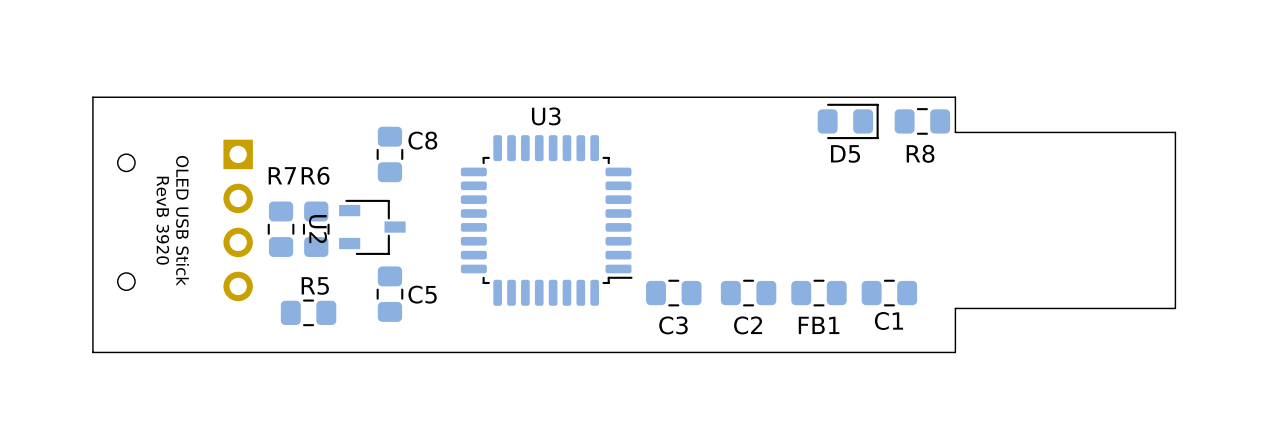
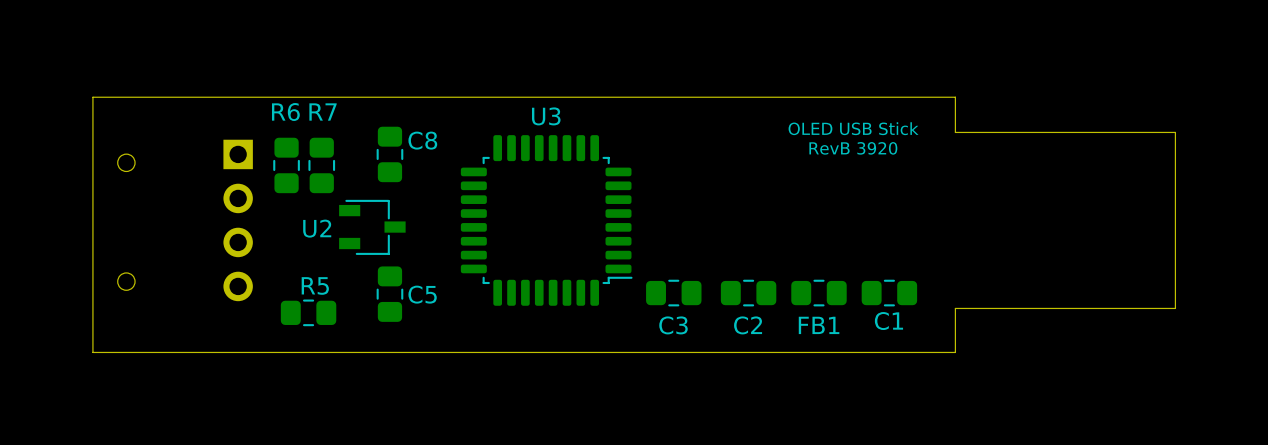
D5: (848, 121) -> none
R8: (922, 121) -> none
text: none -> OLED USB Stick (853, 128)
text: none -> RevB 3920 (853, 148)
text: RevB 3920 (162, 220) -> none
text: OLED USB Stick (182, 220) -> none
R7 position: (281, 229) -> (321, 165)
R6 position: (316, 229) -> (286, 165)
U2 name rotation: 0° (317, 229) -> 90° counterclockwise (317, 228)

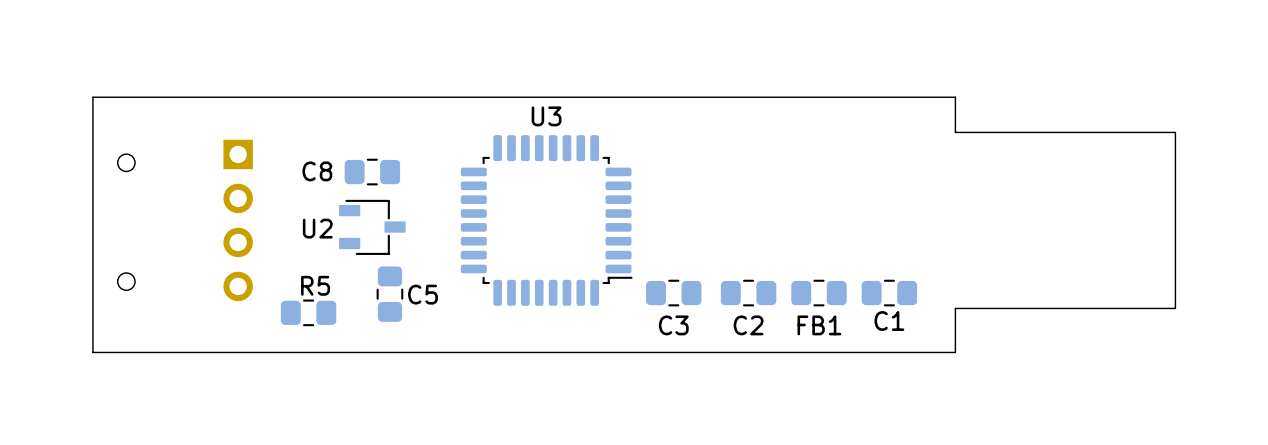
text: OLED USB Stick (853, 128) -> none
C8 name position: C8 (422, 140) -> C8 (317, 171)
text: RevB 3920 (853, 148) -> none
C8 rotation: 0° (389, 154) -> 90° clockwise (372, 172)
R6: (286, 165) -> none
R7: (321, 165) -> none

